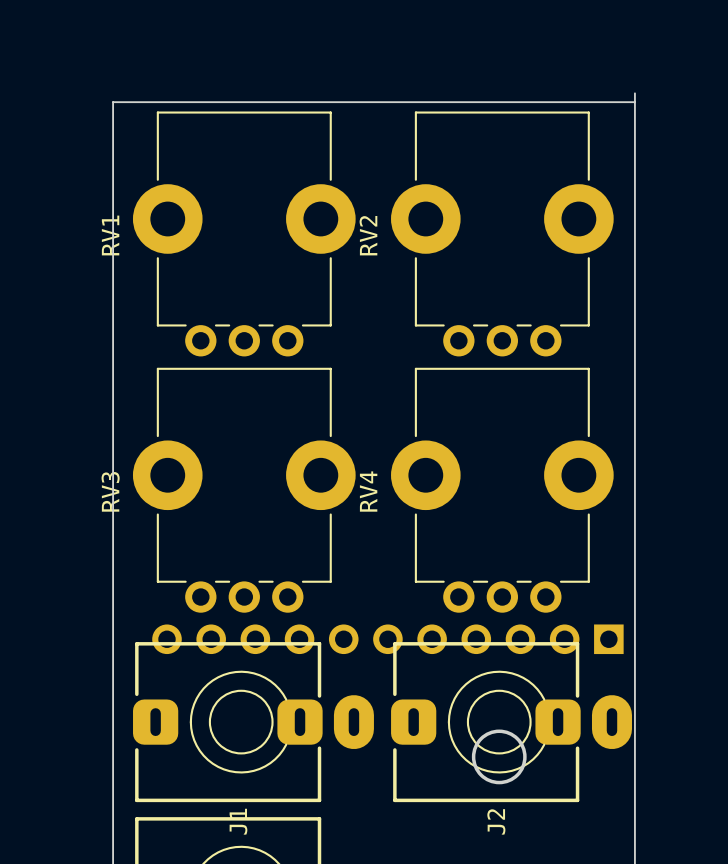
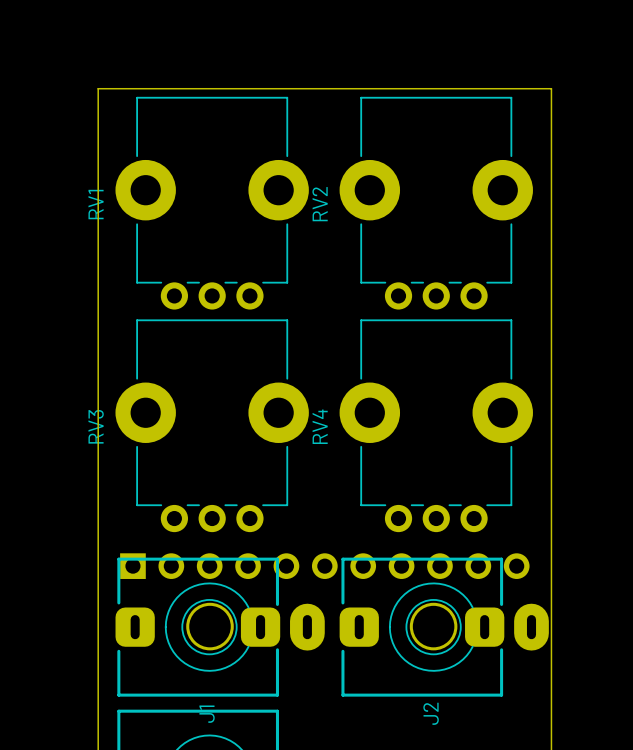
board edge: (634, 93) (634, 102) -> none
part rotation: 0° (387, 639) -> 180° (324, 566)
round board edge: none -> [186, 602, 234, 651]
round board edge position: (499, 756) -> (433, 626)

